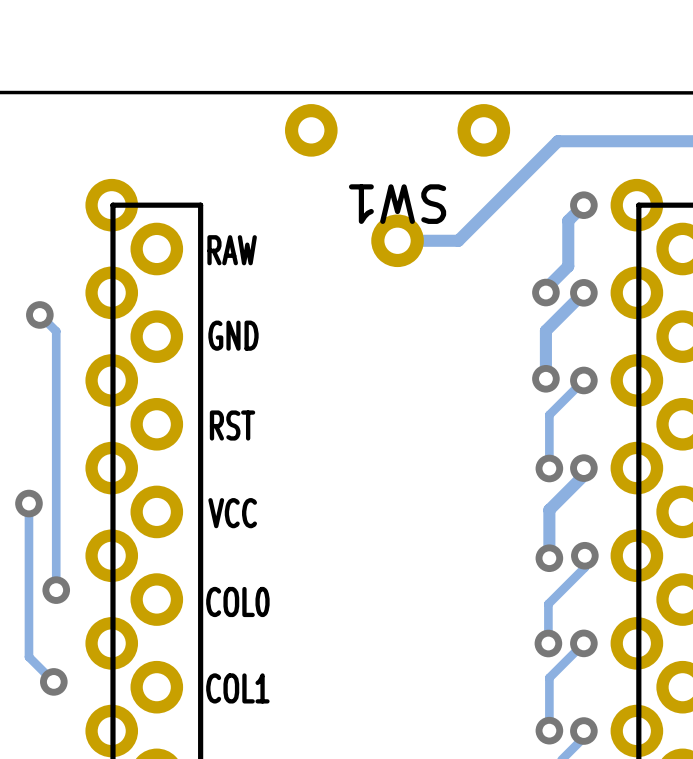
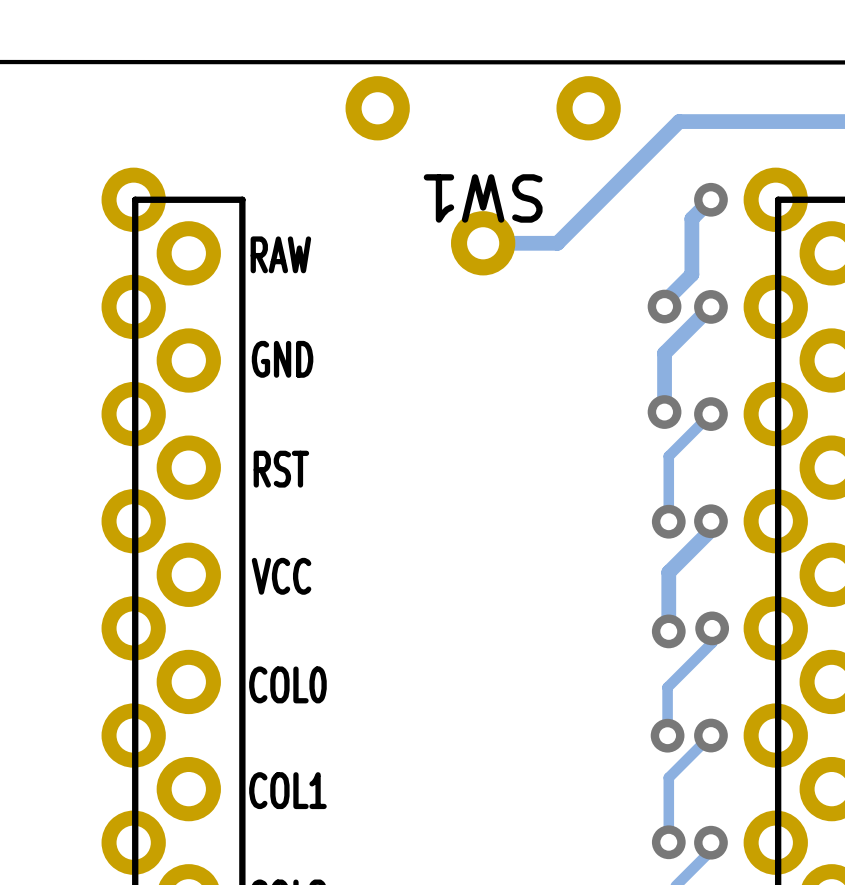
track: (37, 313) (56, 331) (56, 590) -> none
via: (39, 314) -> none
track: (28, 501) (28, 657) (53, 681) -> none
via: (28, 503) -> none
via: (56, 590) -> none
via: (53, 681) -> none

